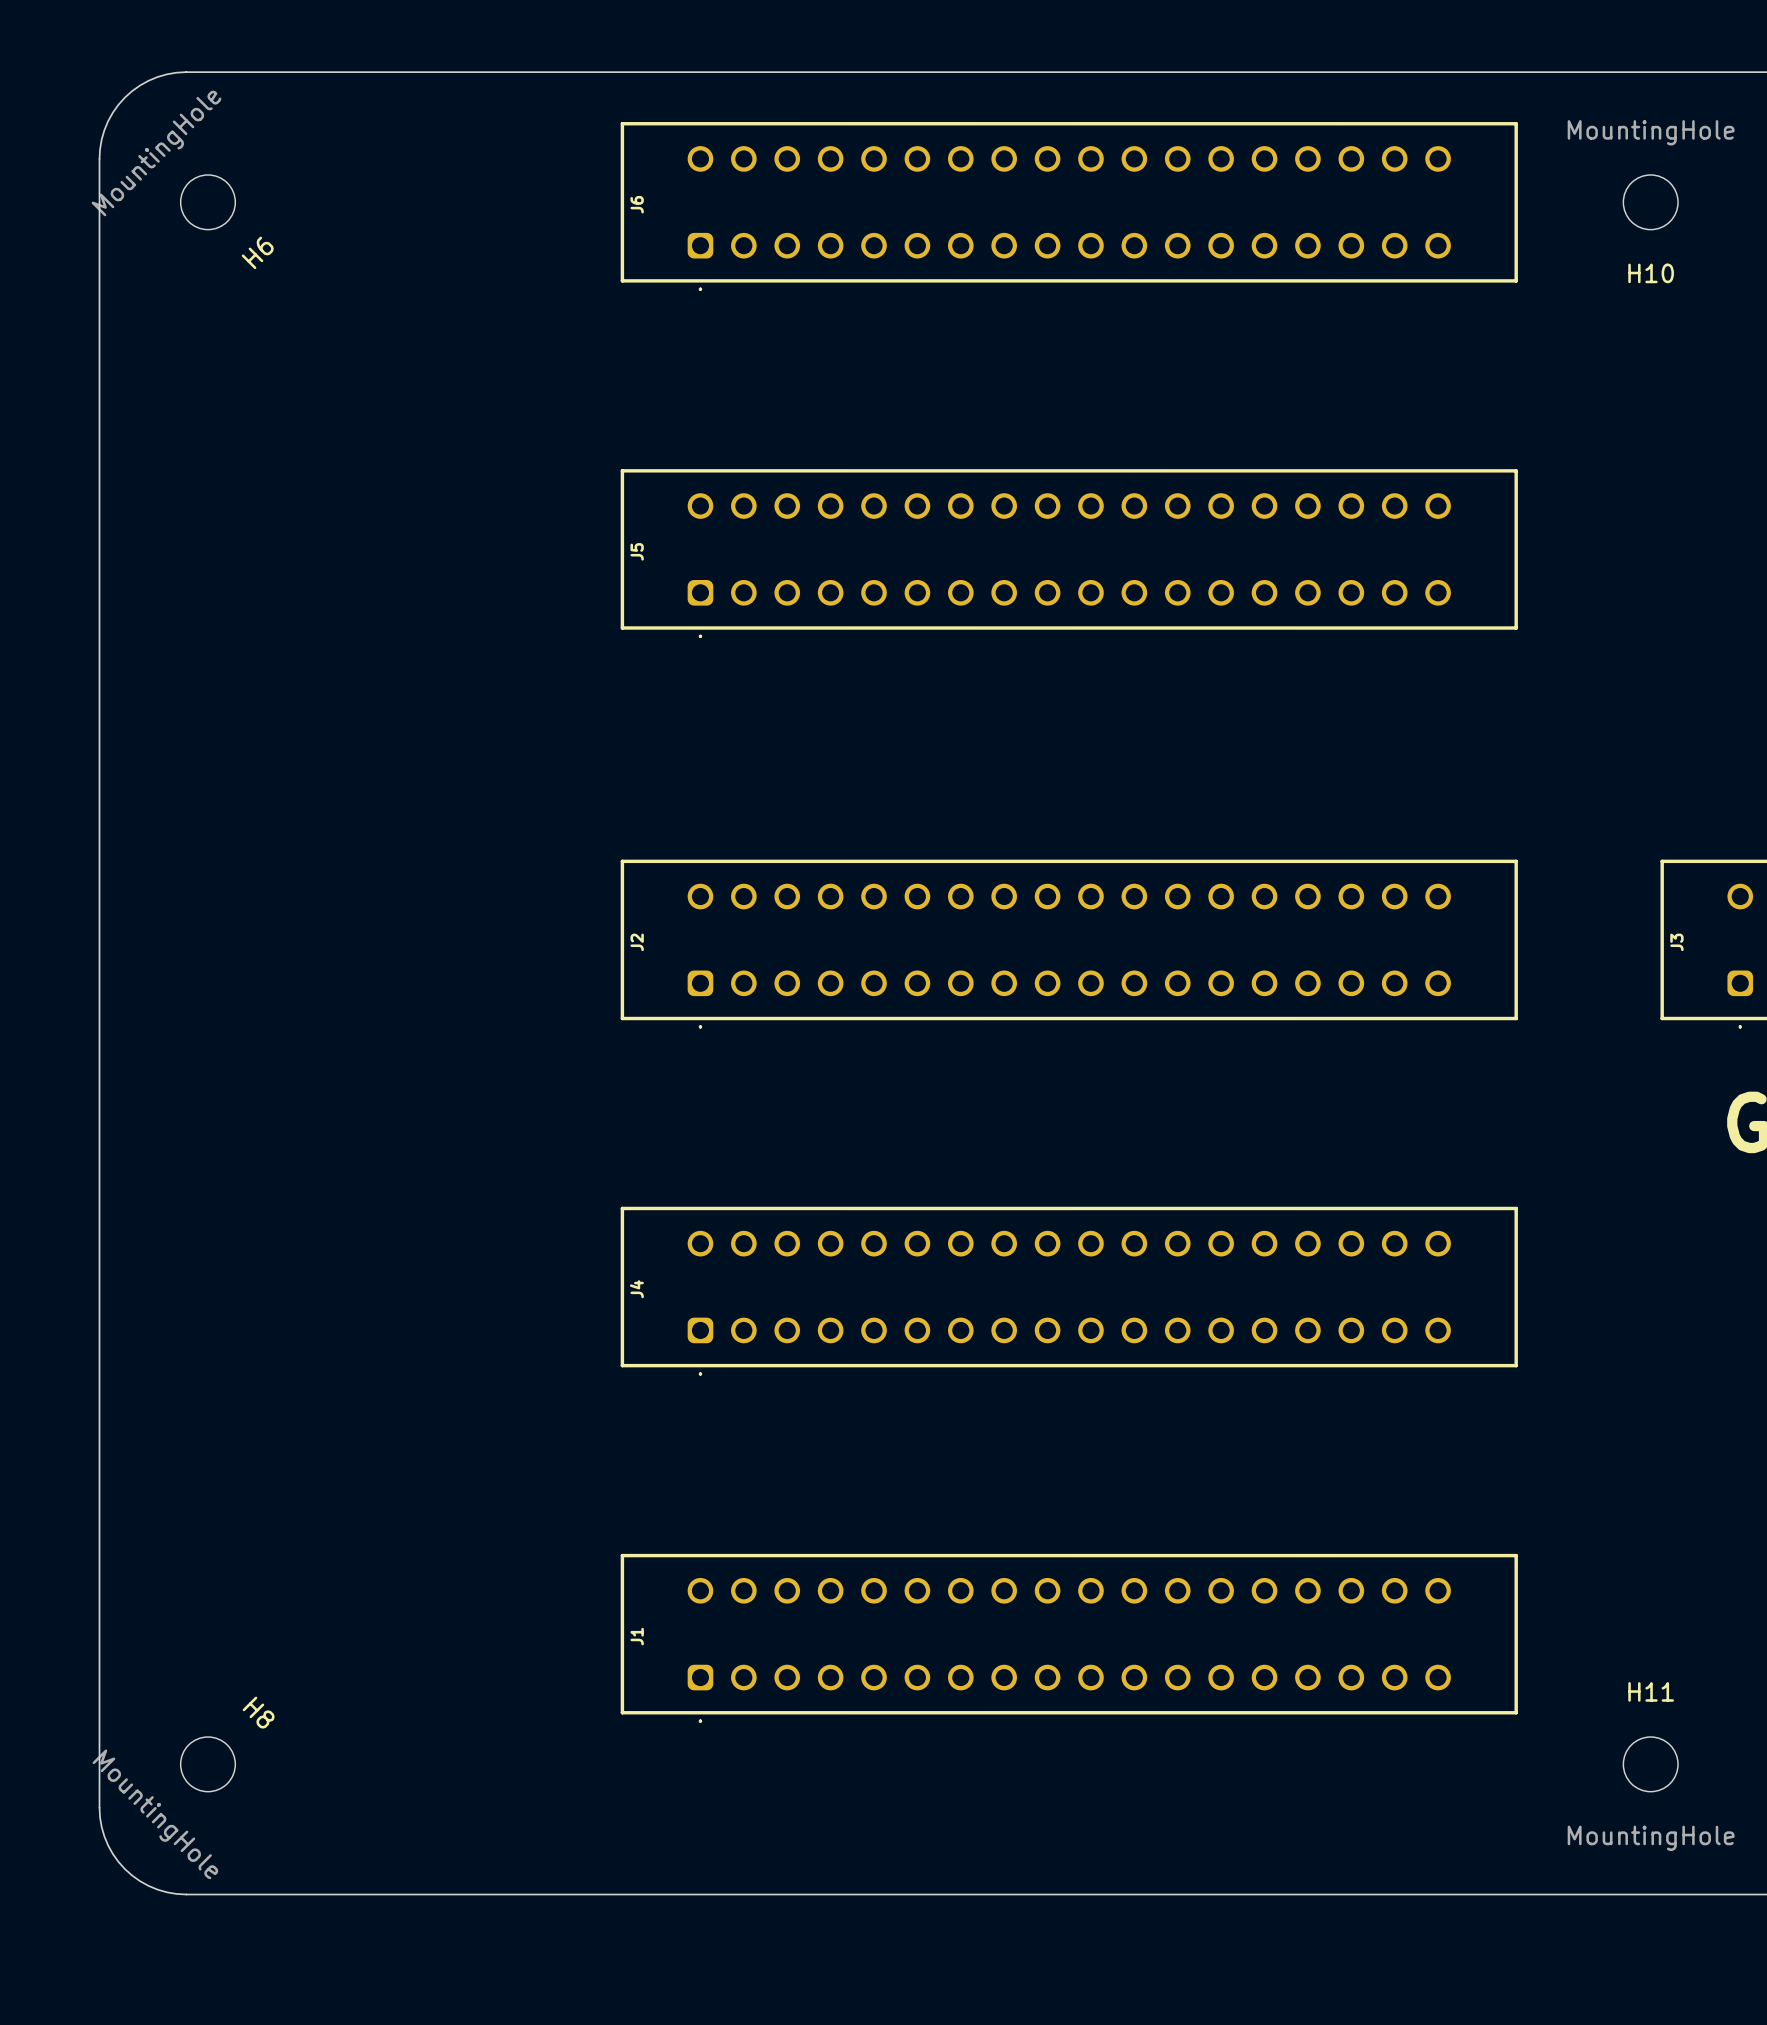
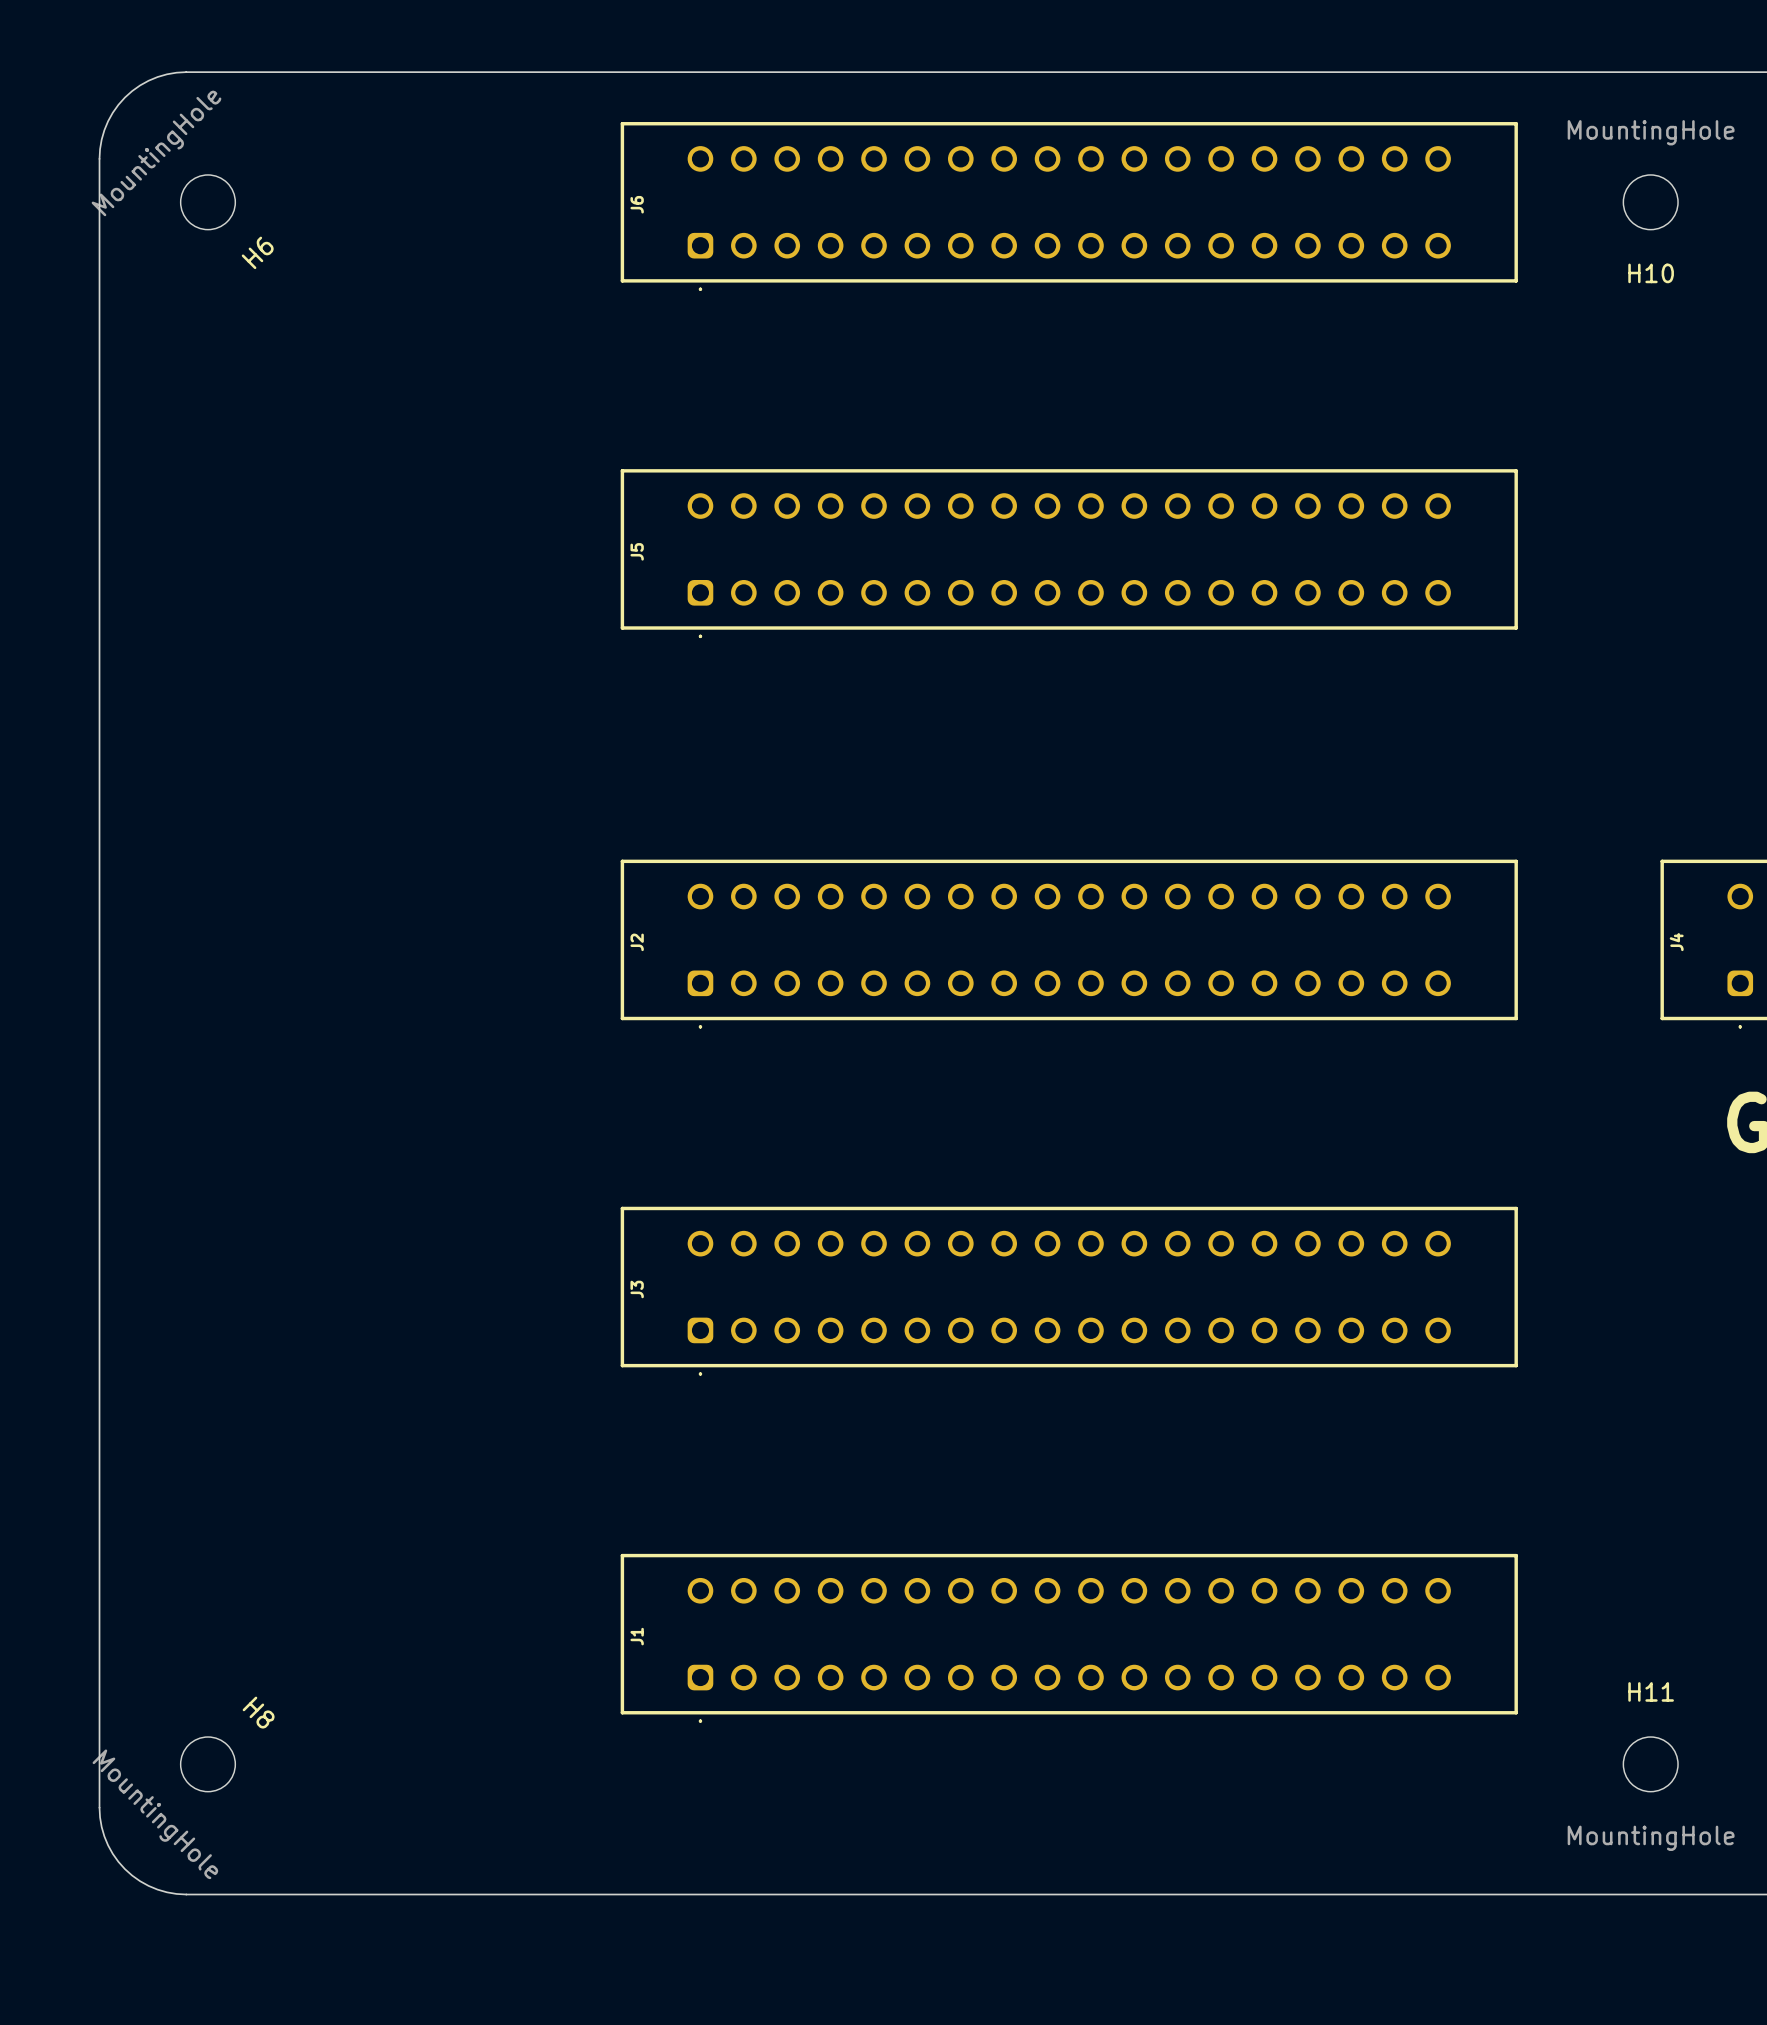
J3 name: J3 (1676, 942) -> J4 (1676, 942)
J4 name: J4 (636, 1289) -> J3 (637, 1289)

